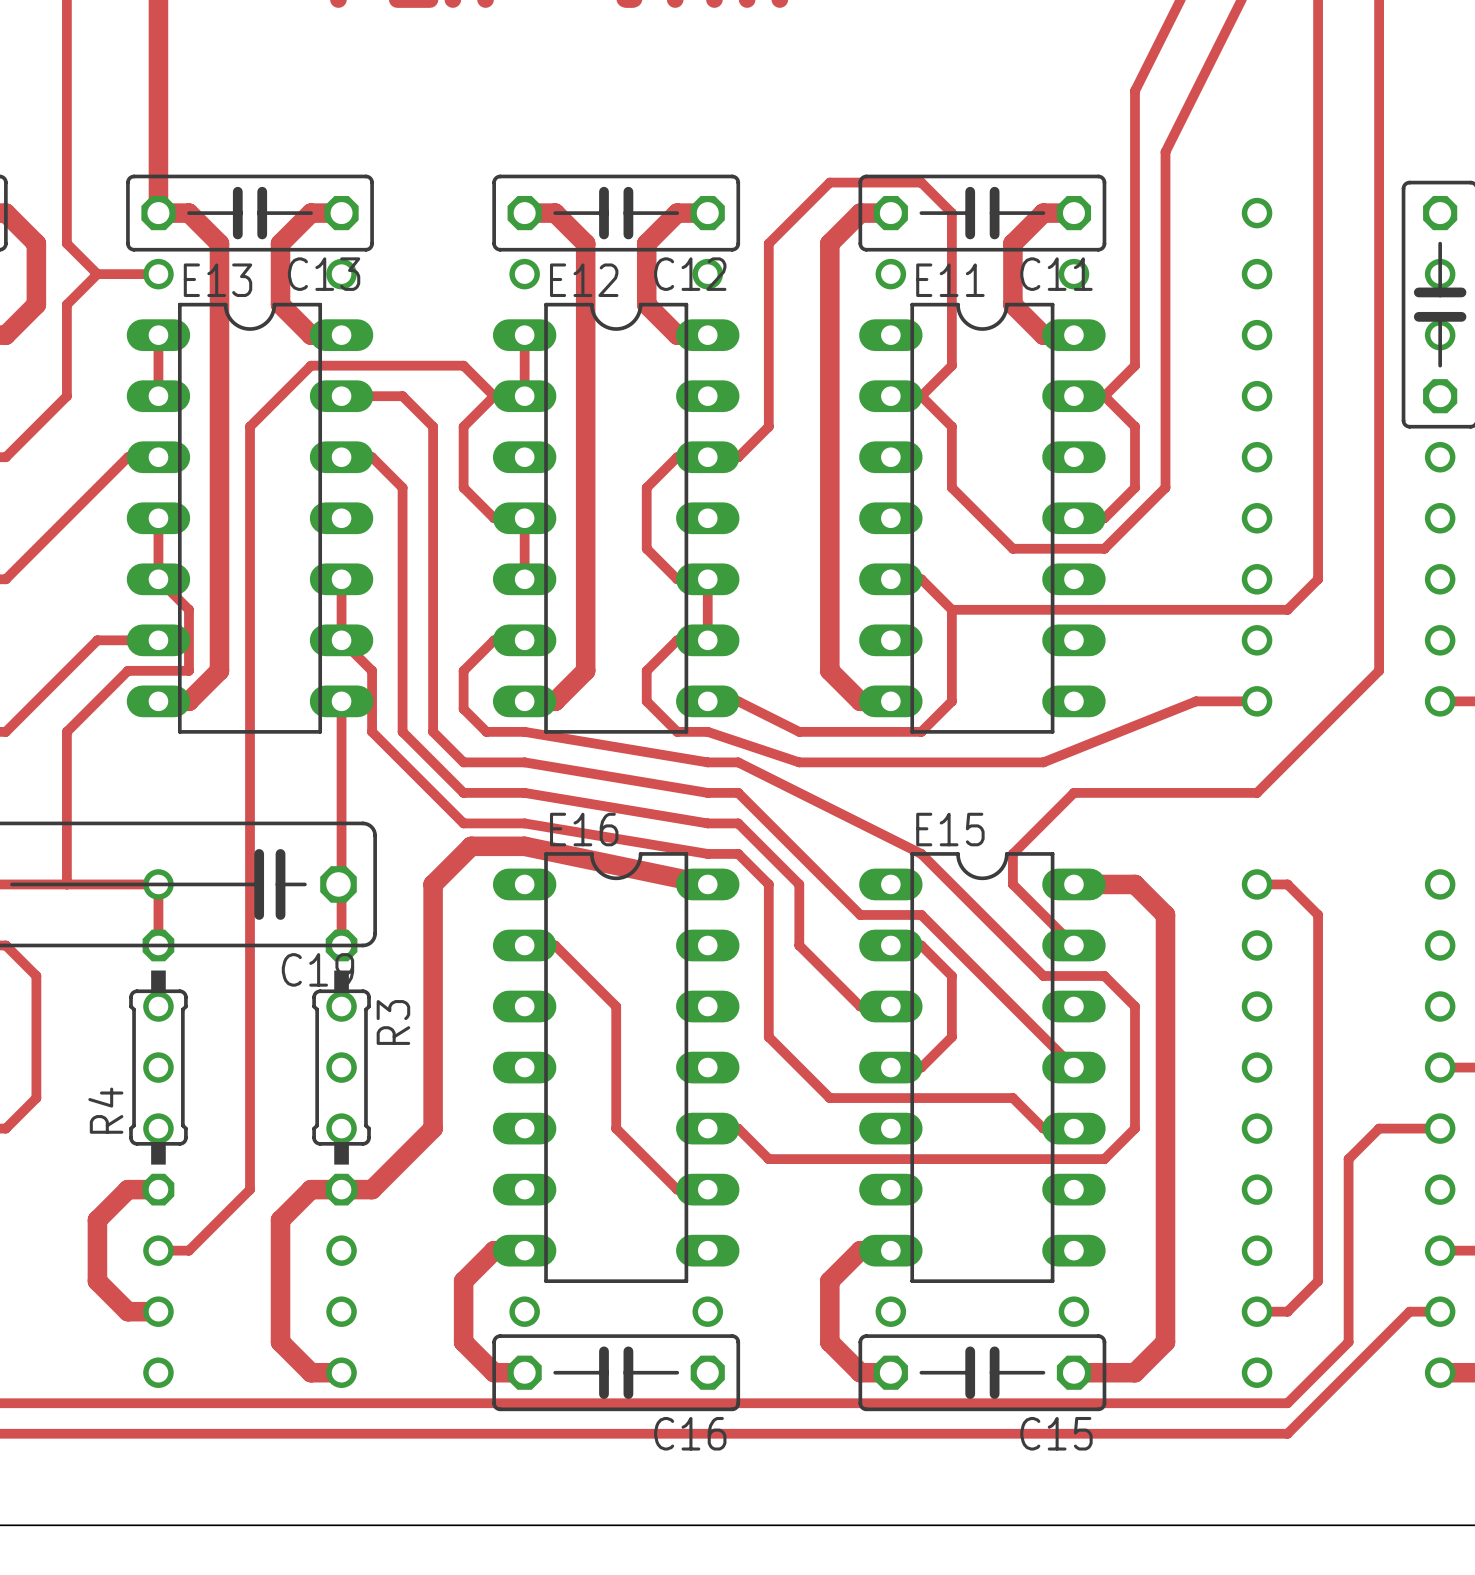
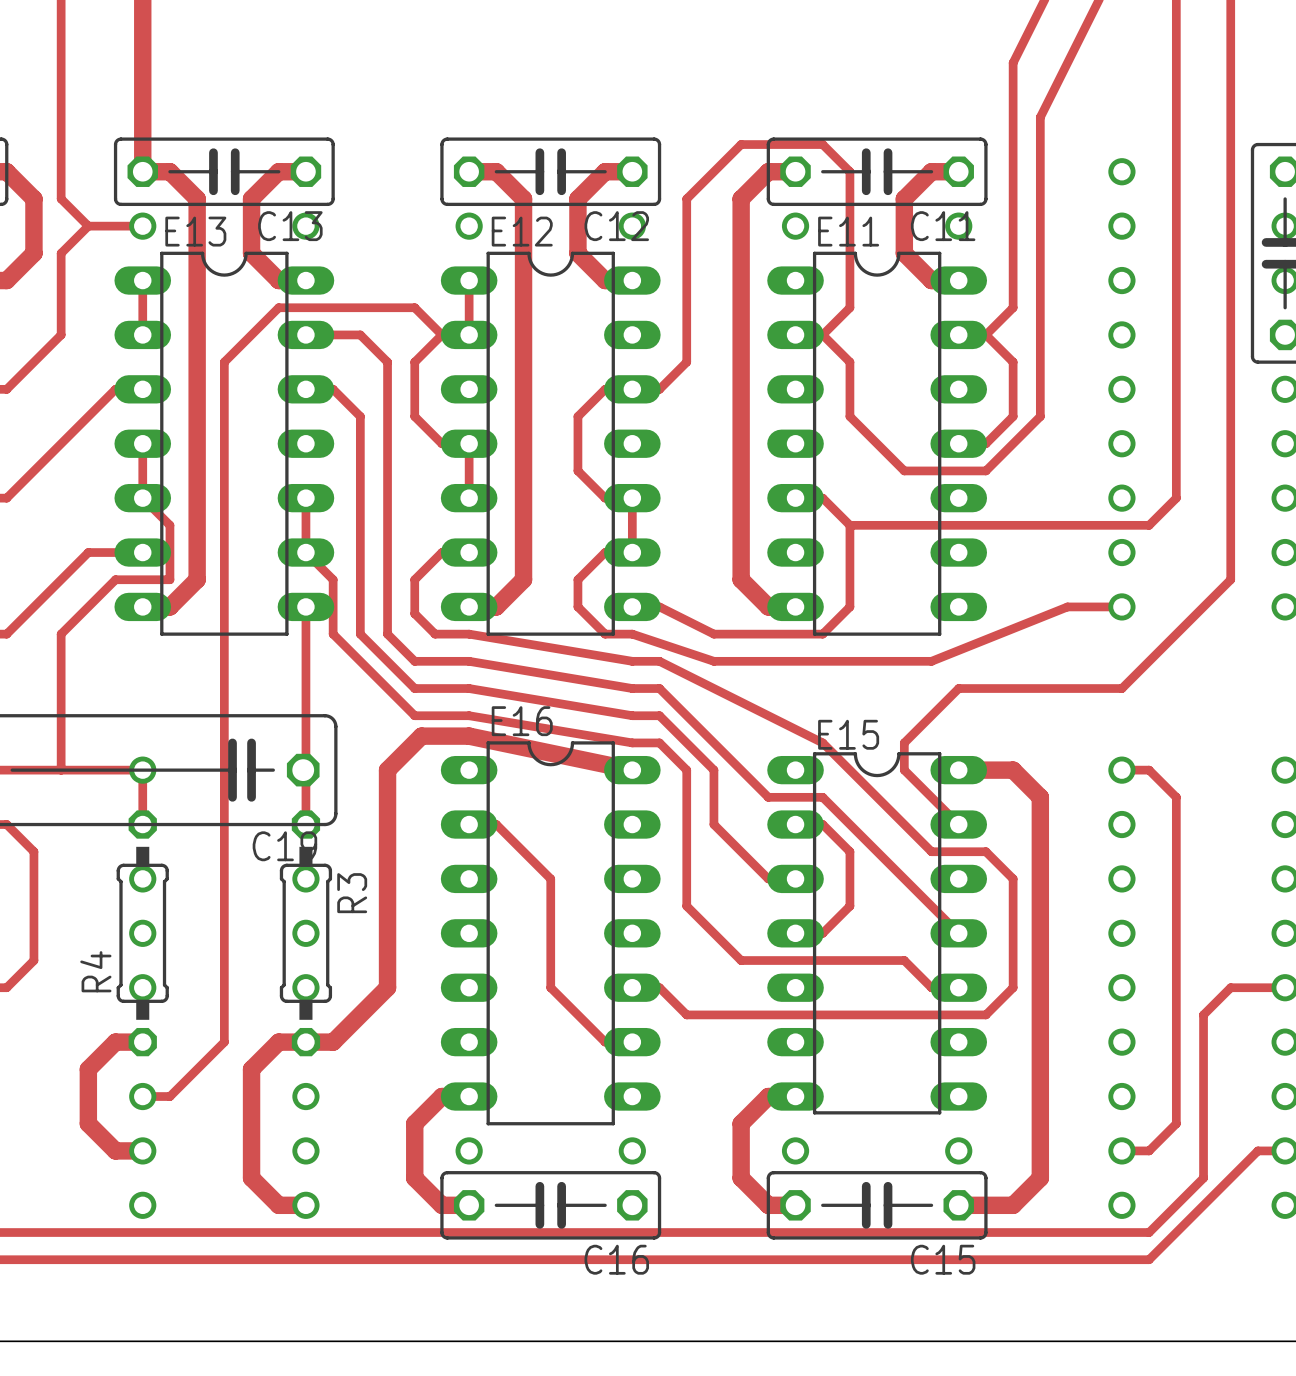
E15 name position: E15 (950, 829) -> E15 (848, 734)
E15 footprint: [859, 852, 1106, 1284] -> [767, 752, 988, 1115]

